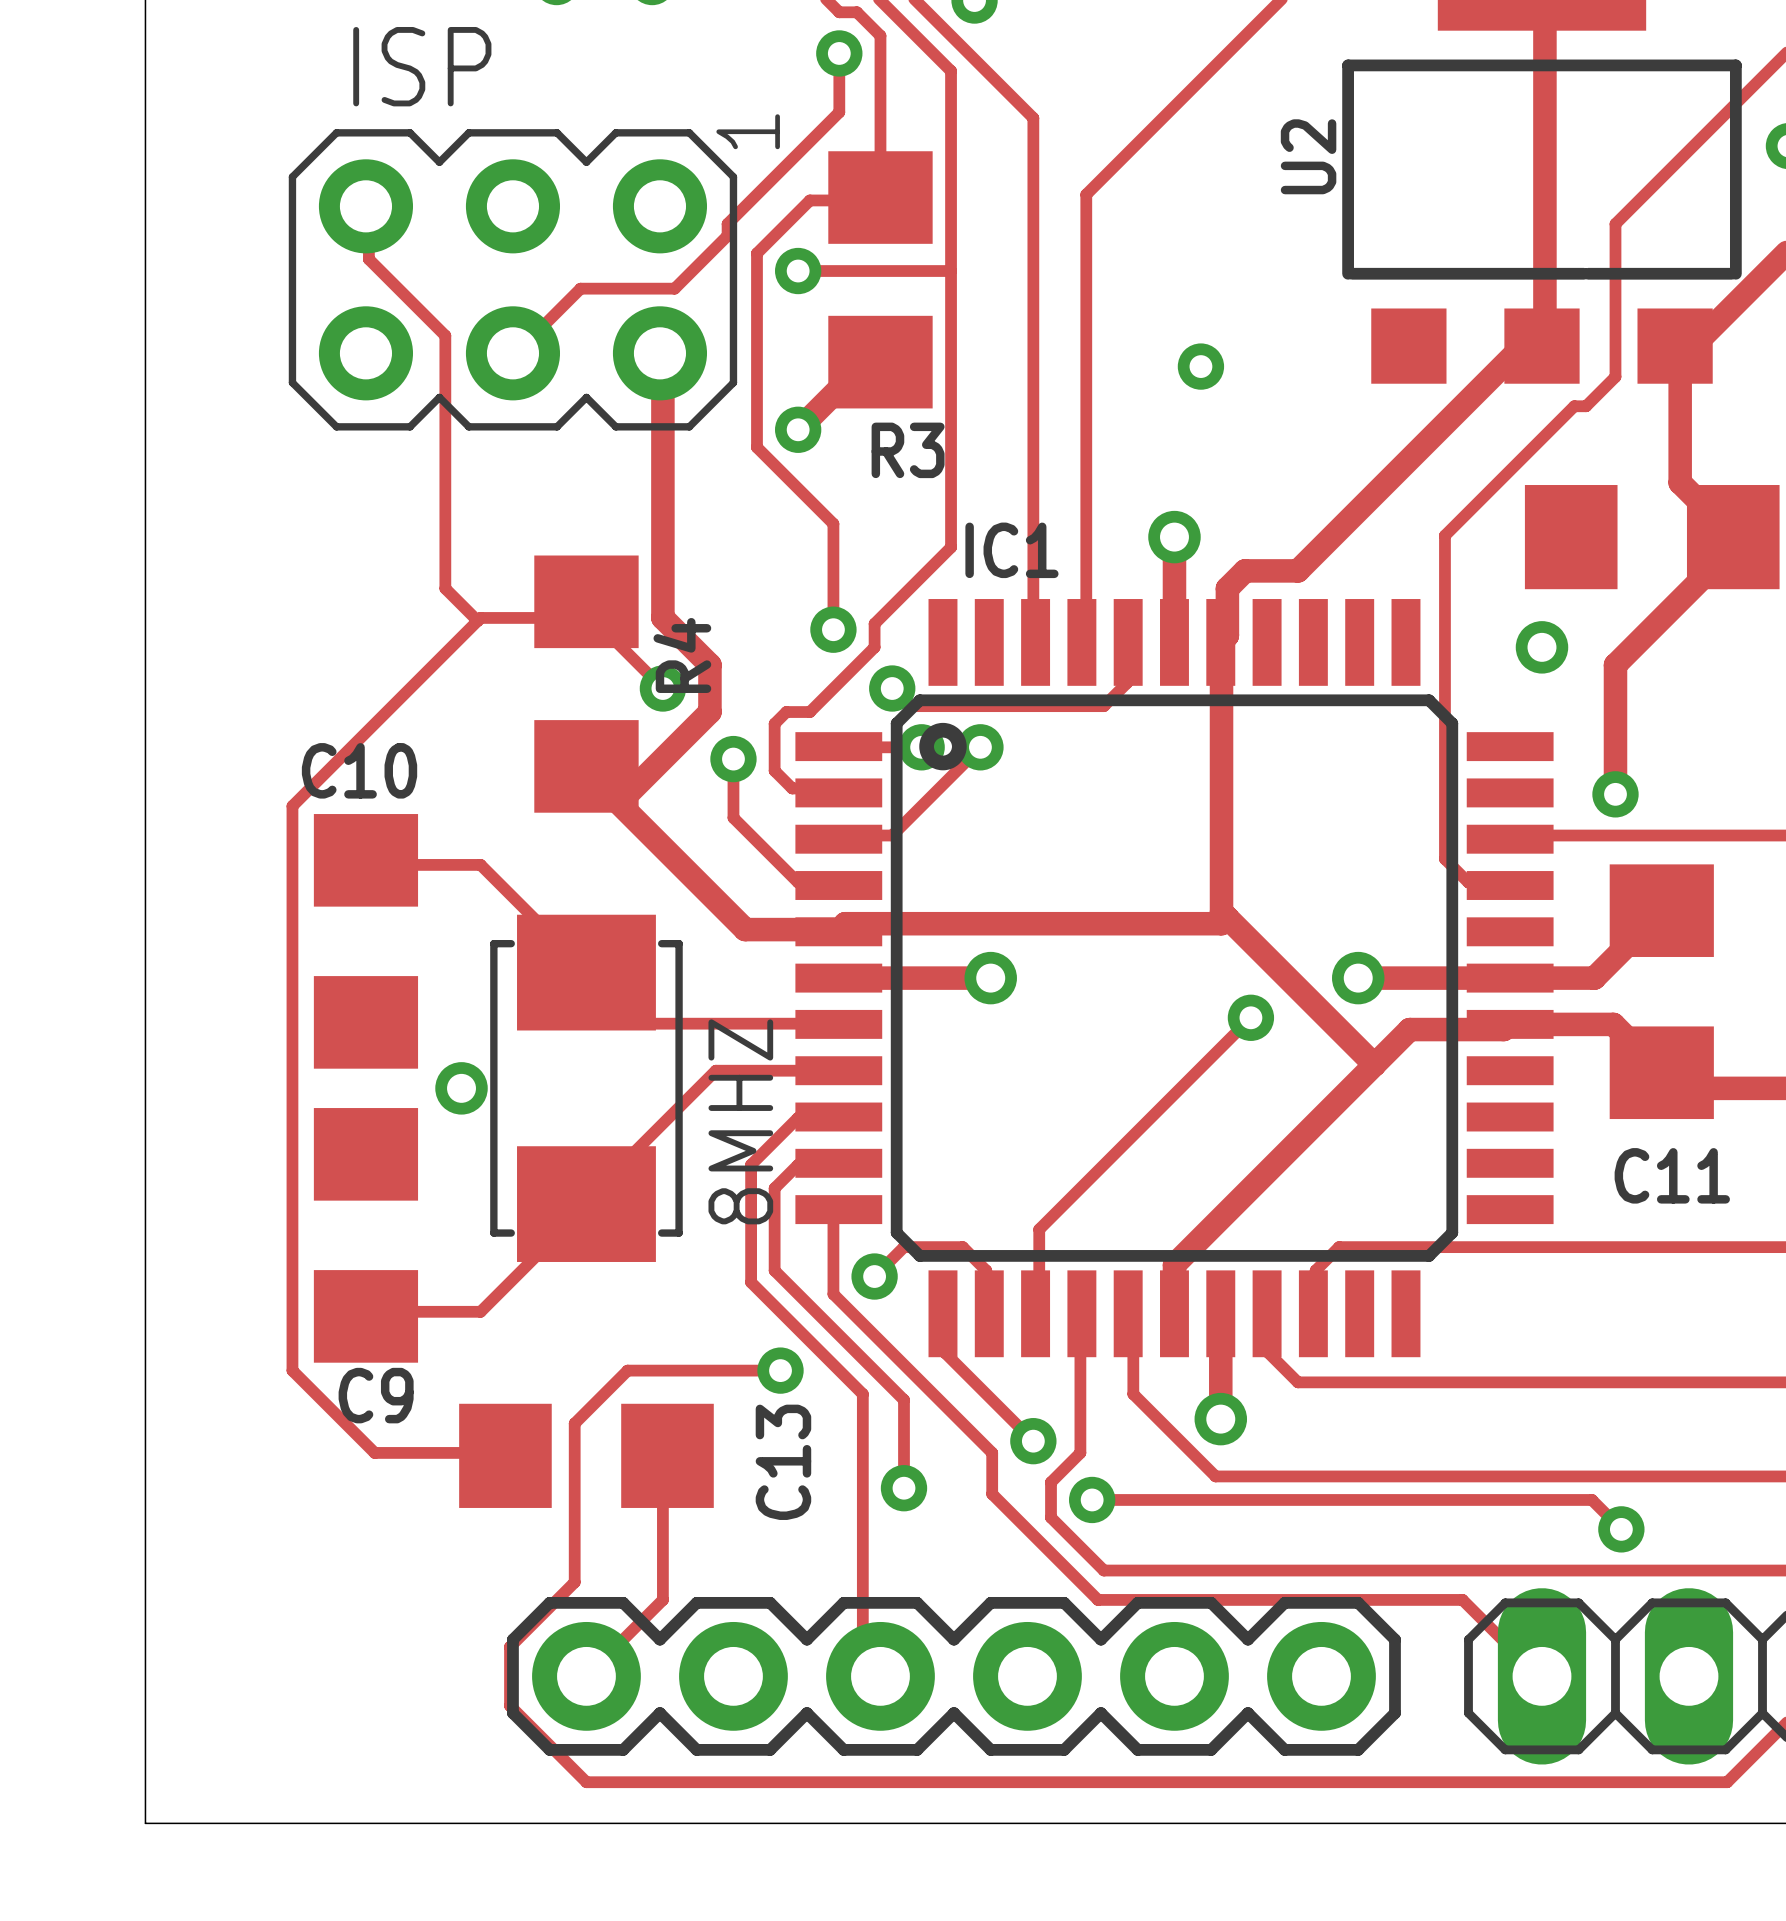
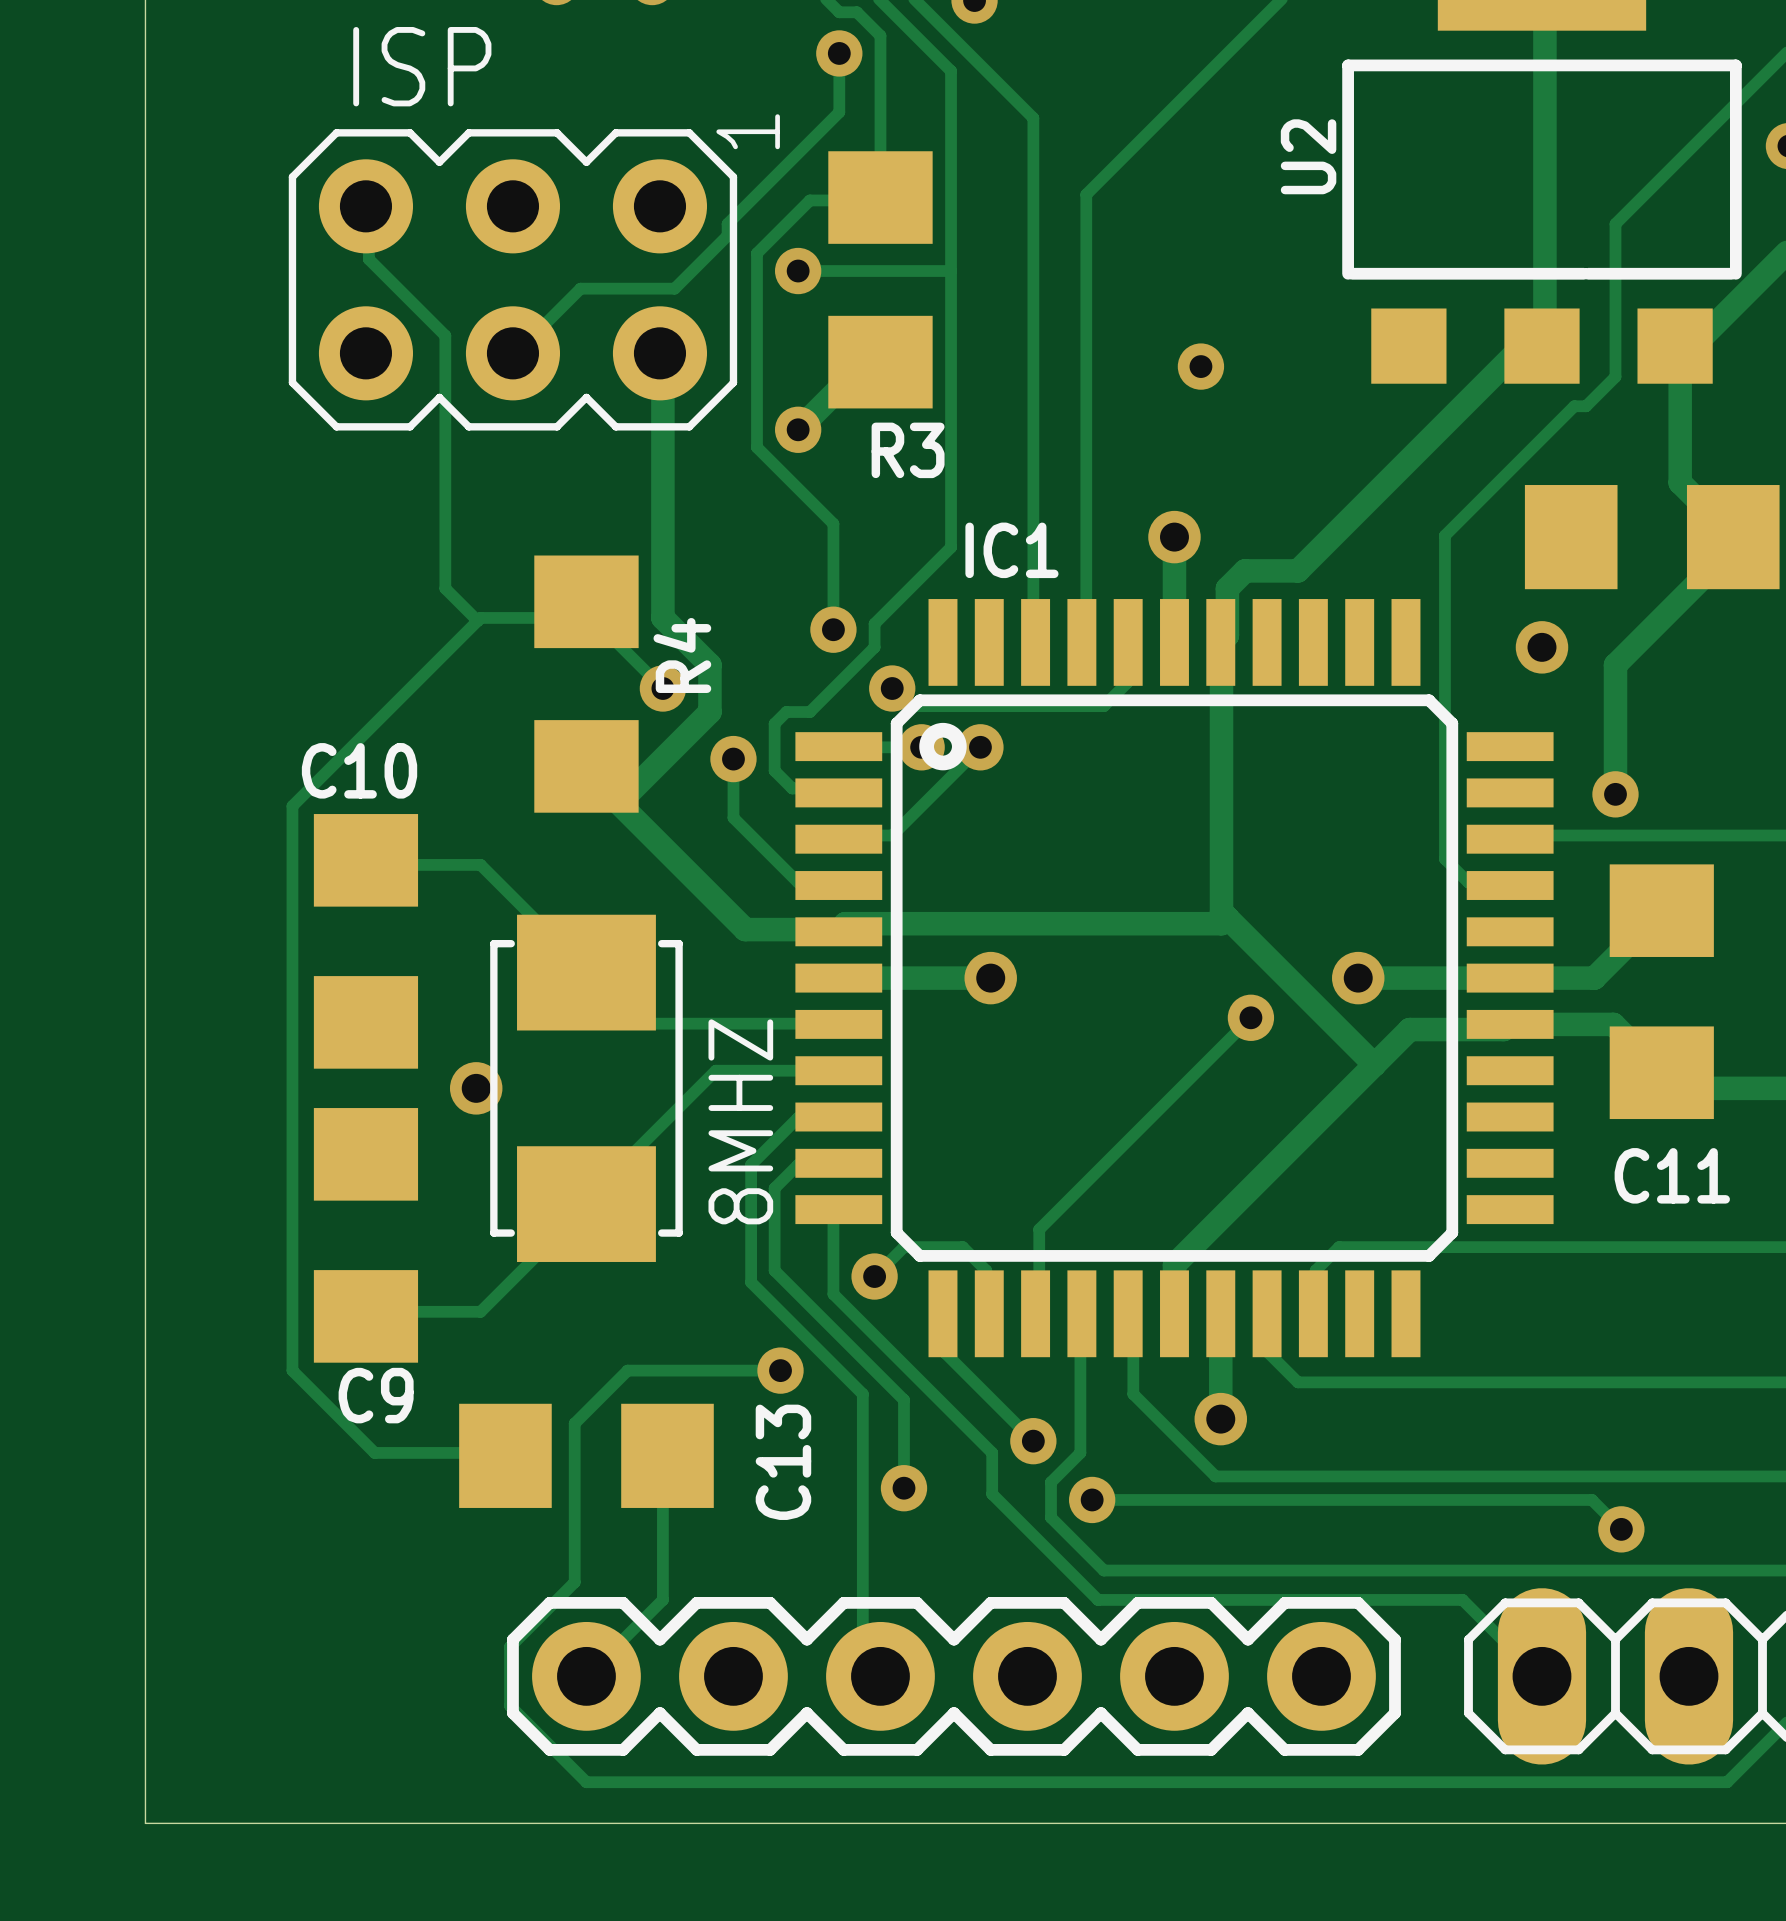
via position: (461, 1088) -> (476, 1088)

